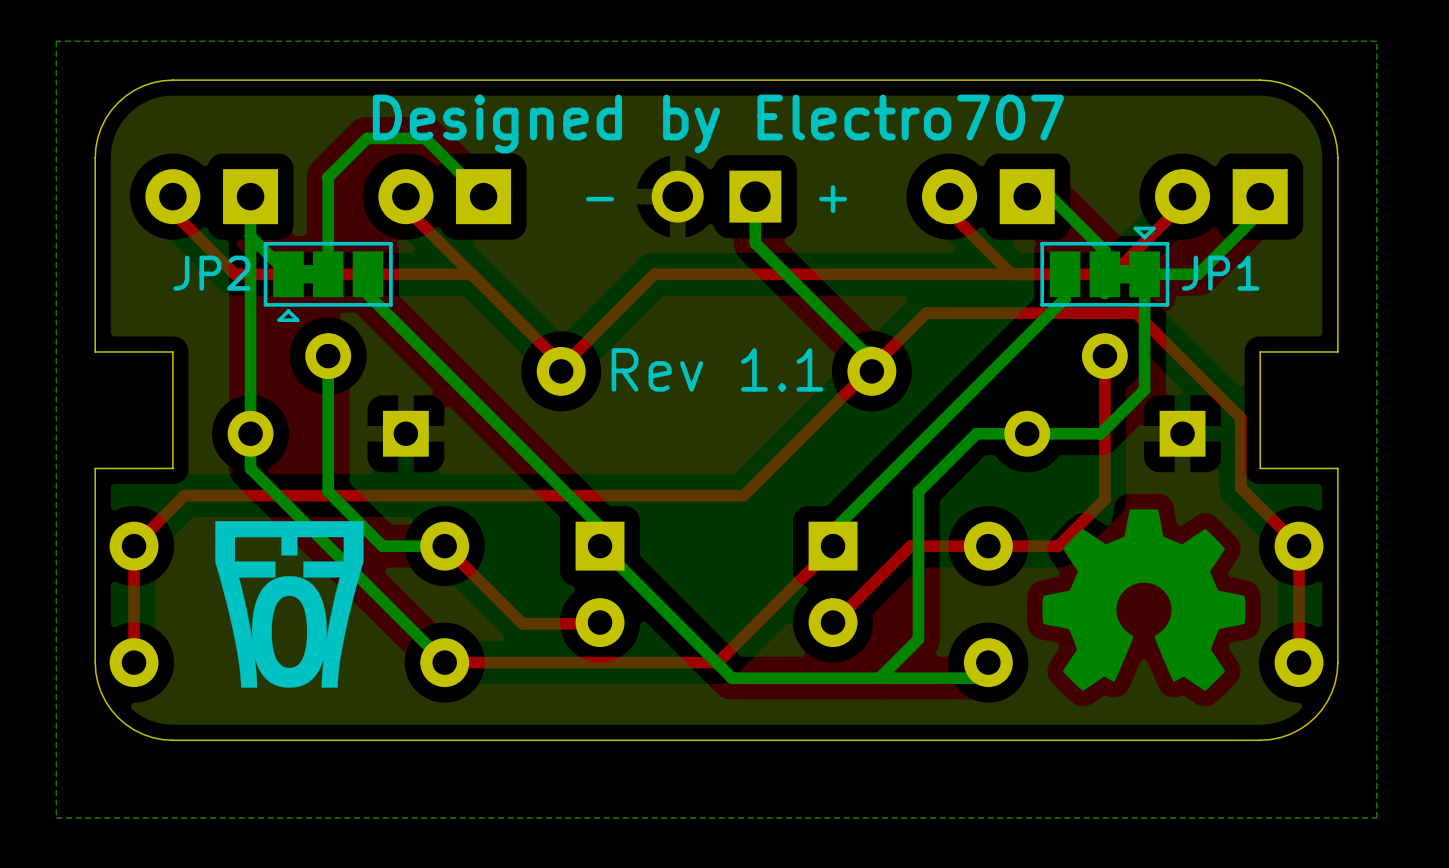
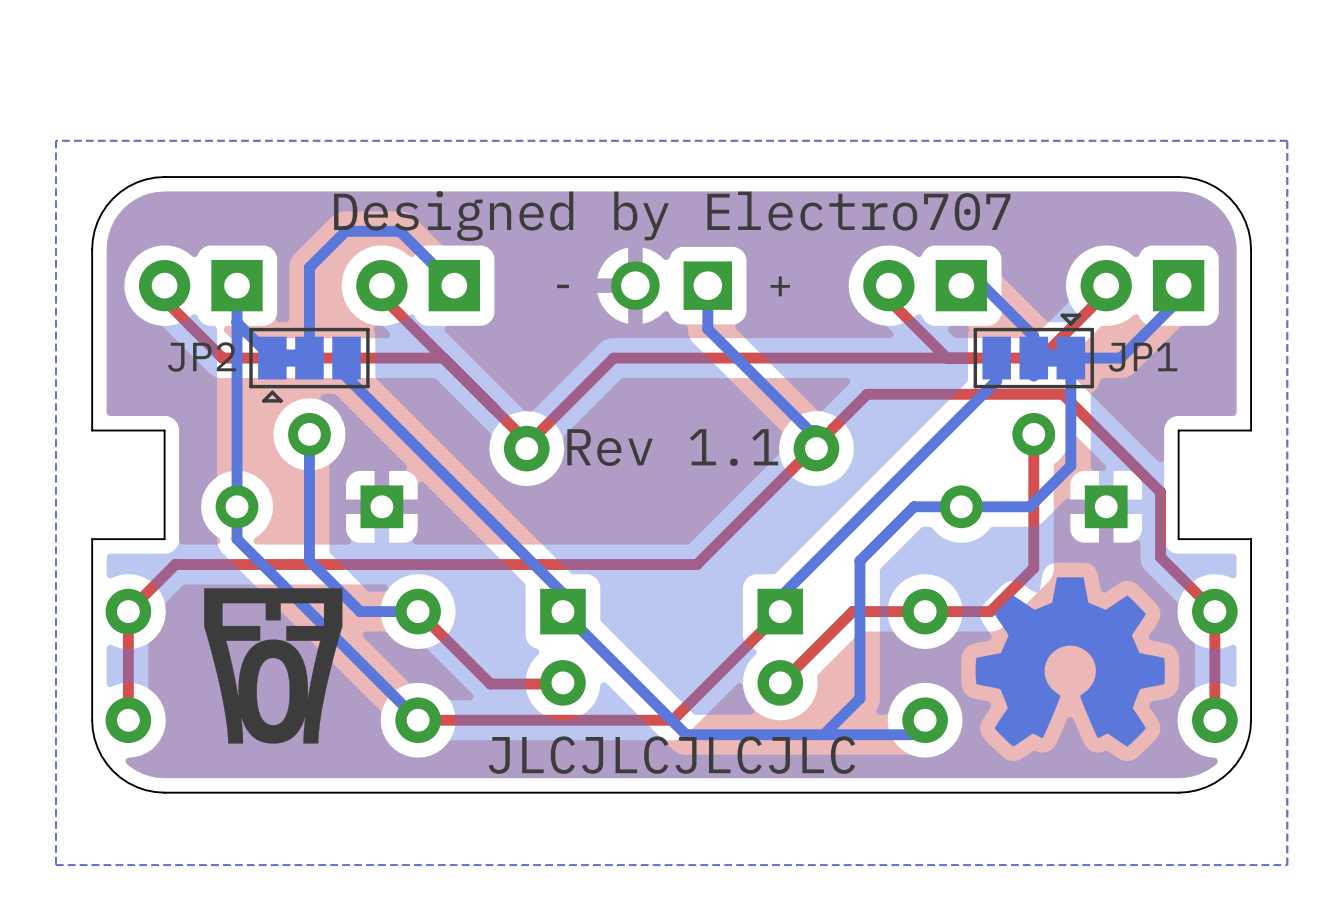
text: none -> JLCJLCJLCJLC (671, 755)

